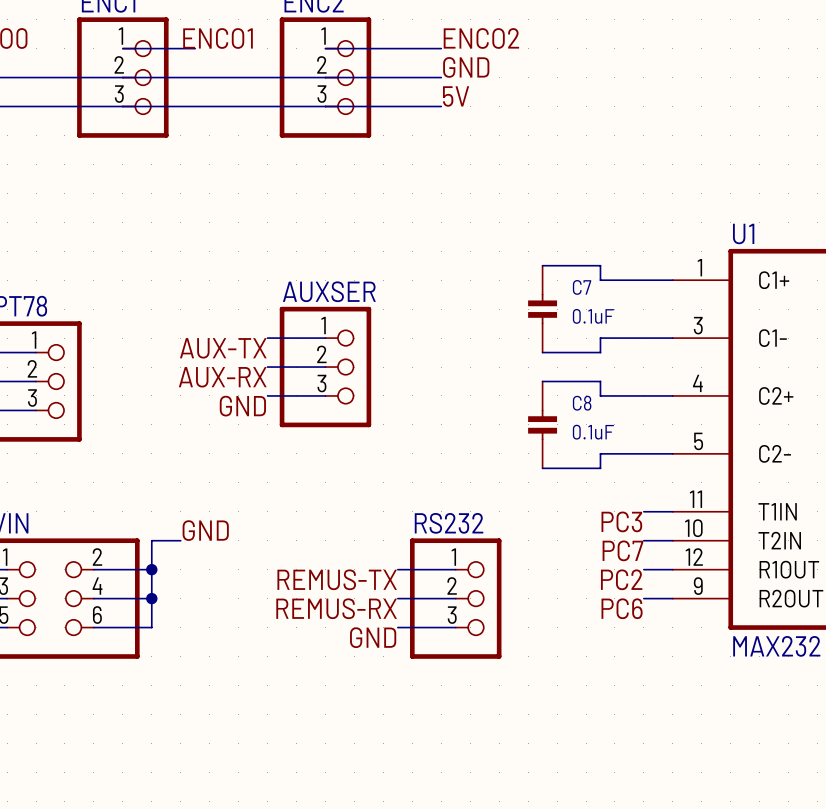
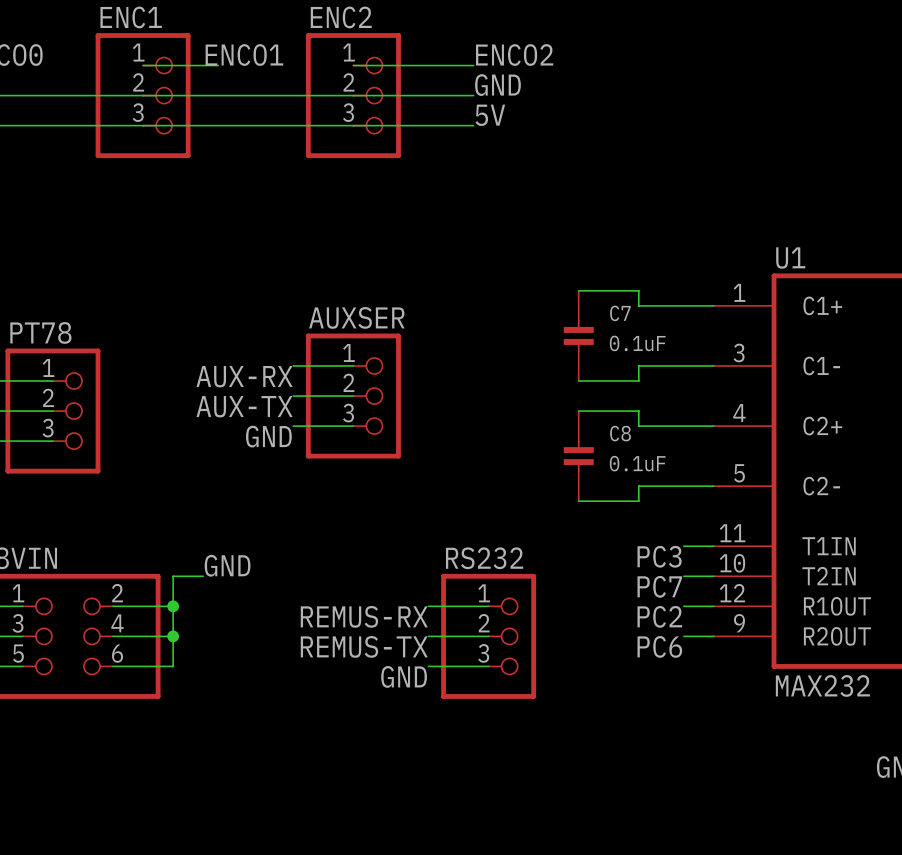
label: AUX-TX (223, 348) -> AUX-RX (244, 376)
label: AUX-RX (222, 377) -> AUX-TX (244, 406)
label: REMUS-TX (337, 579) -> REMUS-RX (364, 616)
label: REMUS-RX (336, 608) -> REMUS-TX (364, 646)

